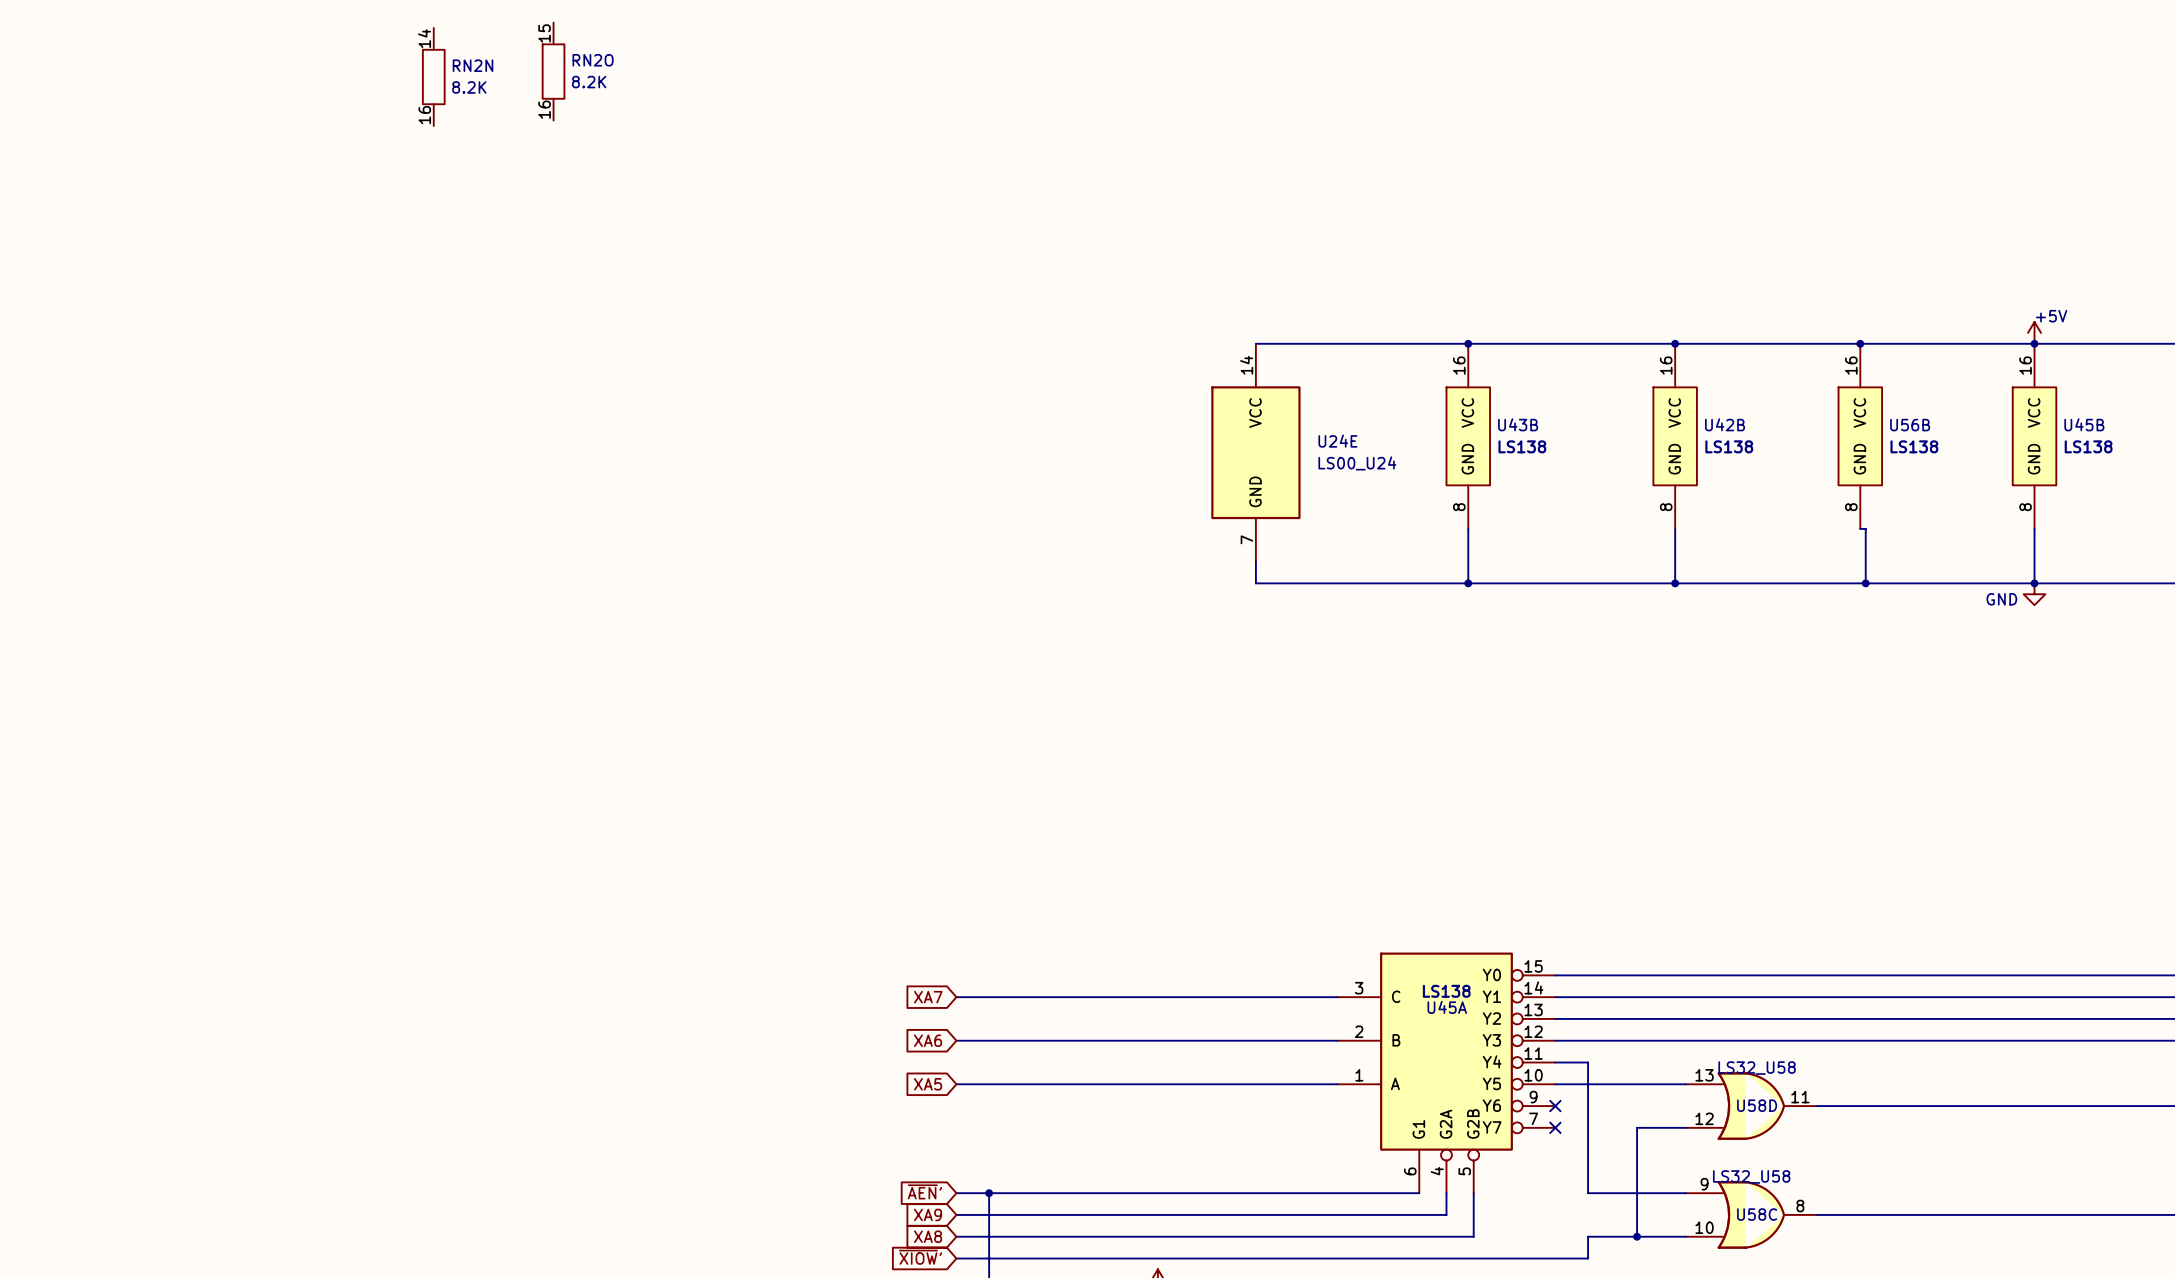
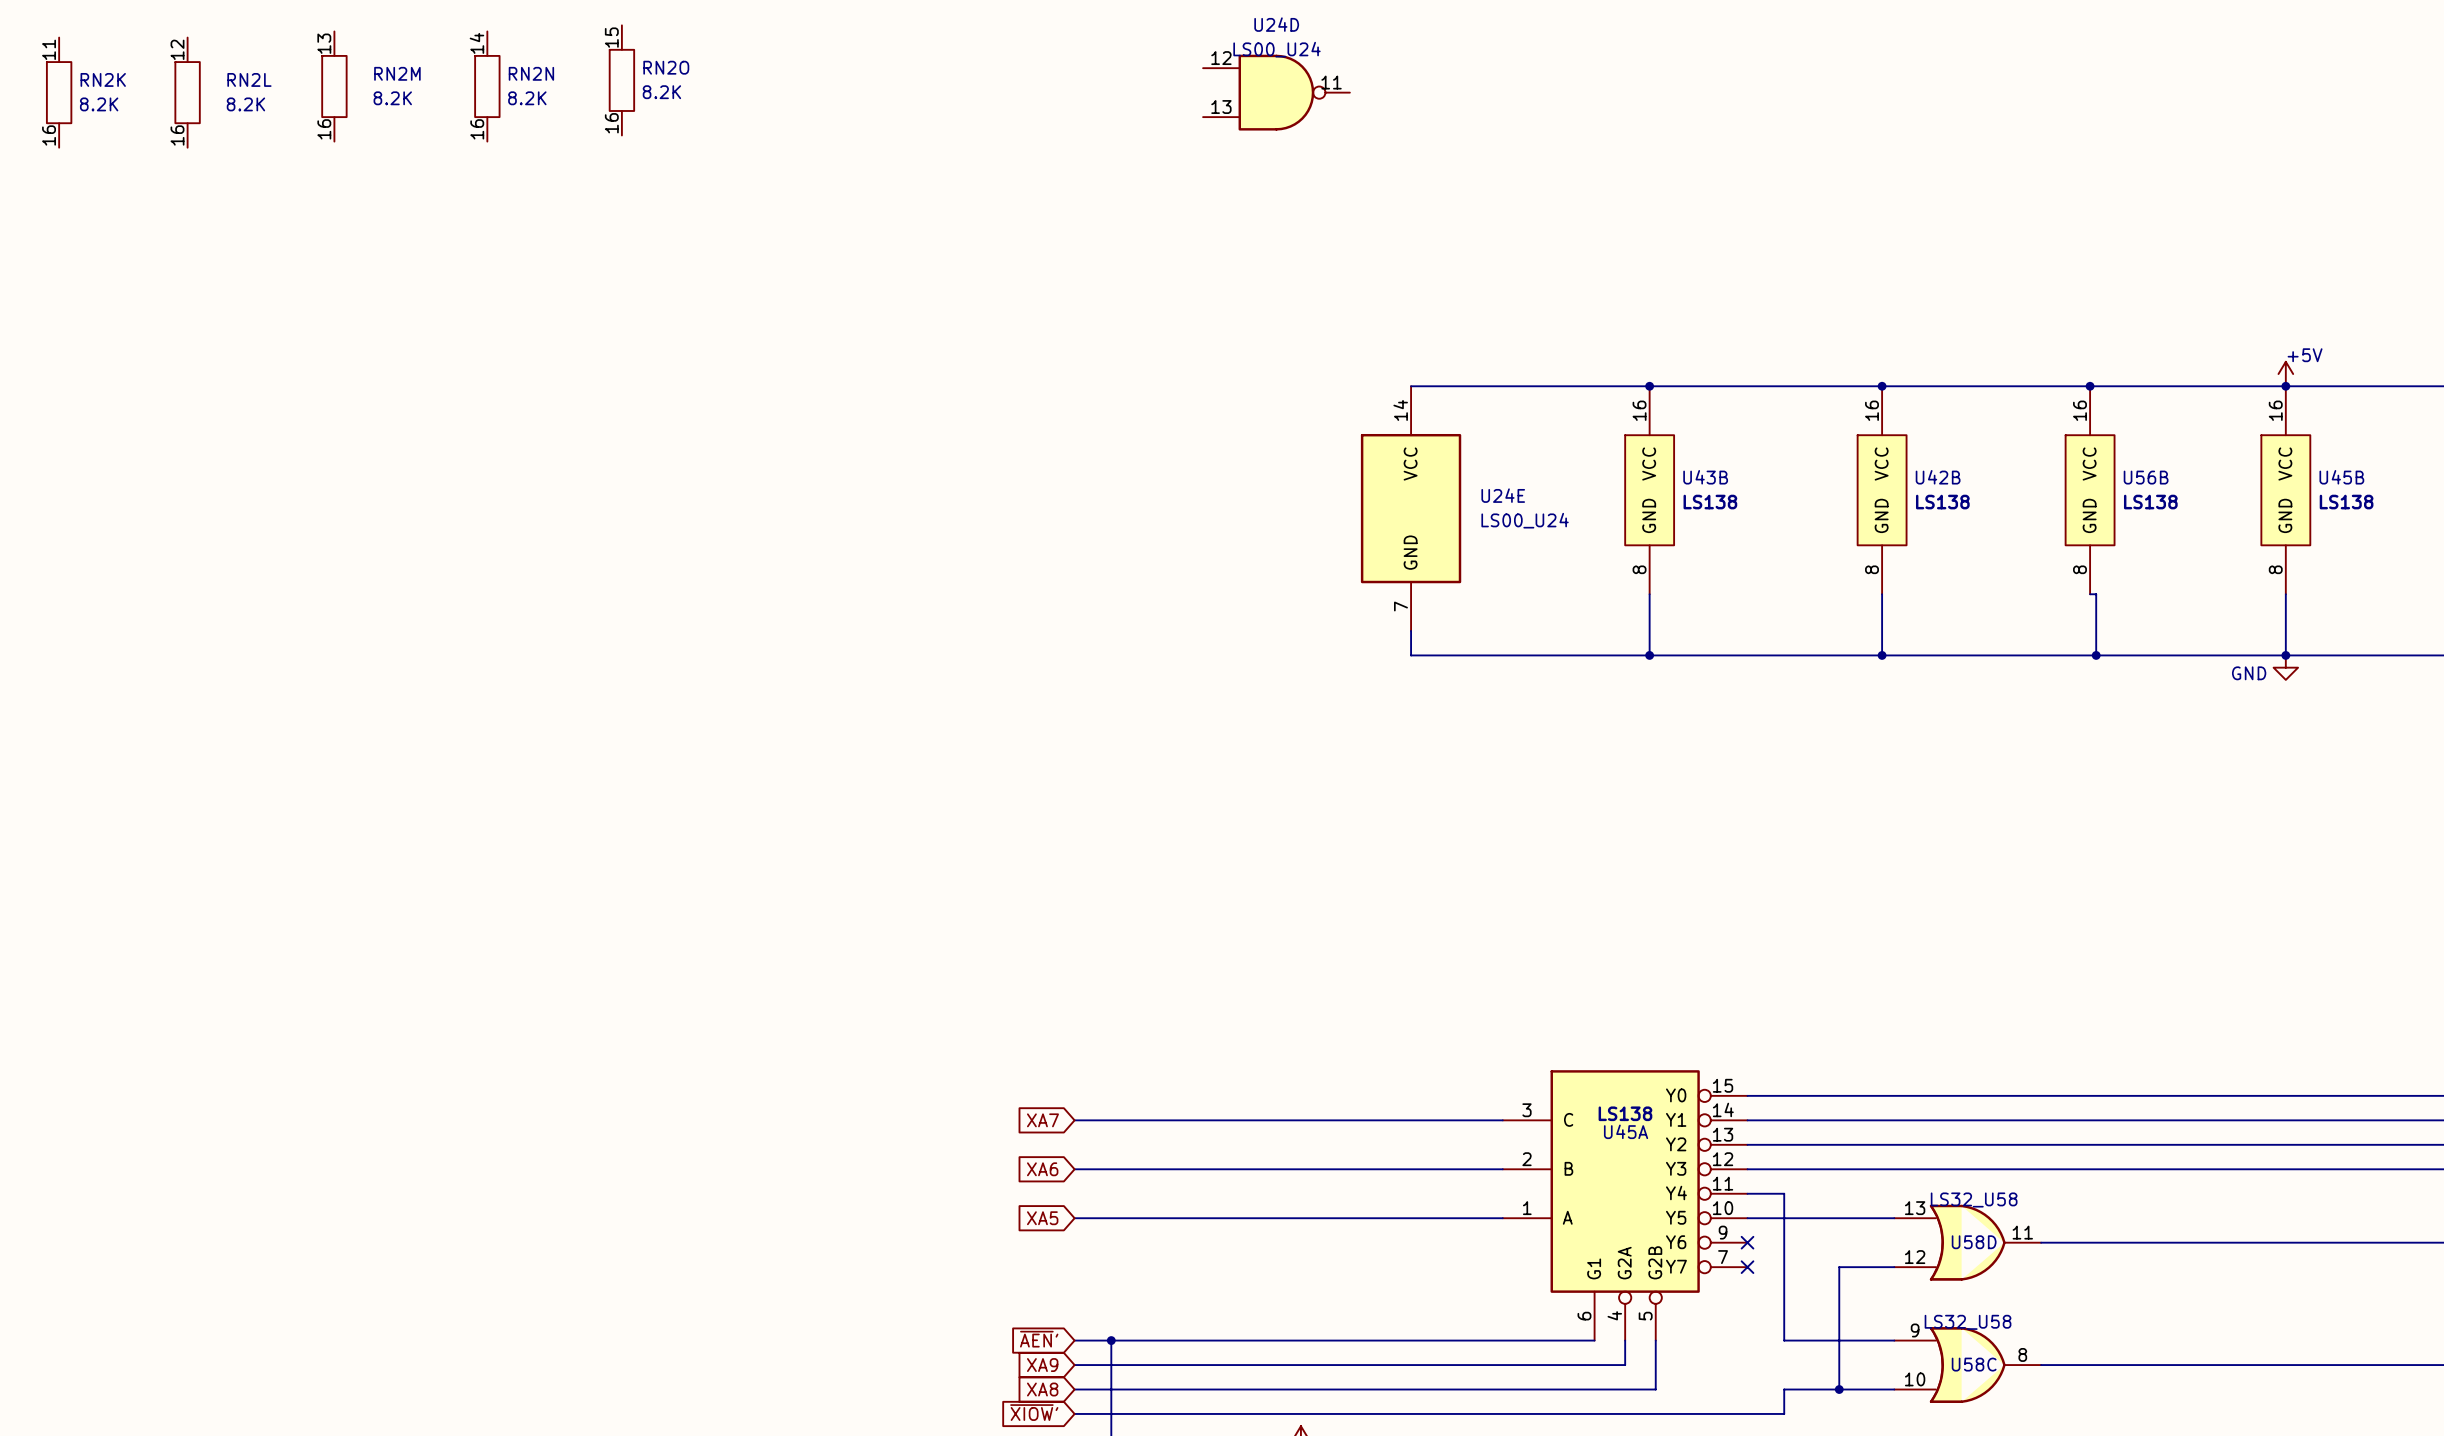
RN2M: none -> 8.2K (334, 86)
RN2K: none -> 8.2K (59, 92)
RN2L: none -> 8.2K (187, 92)
U24D: none -> LS00_U24 (1276, 92)

